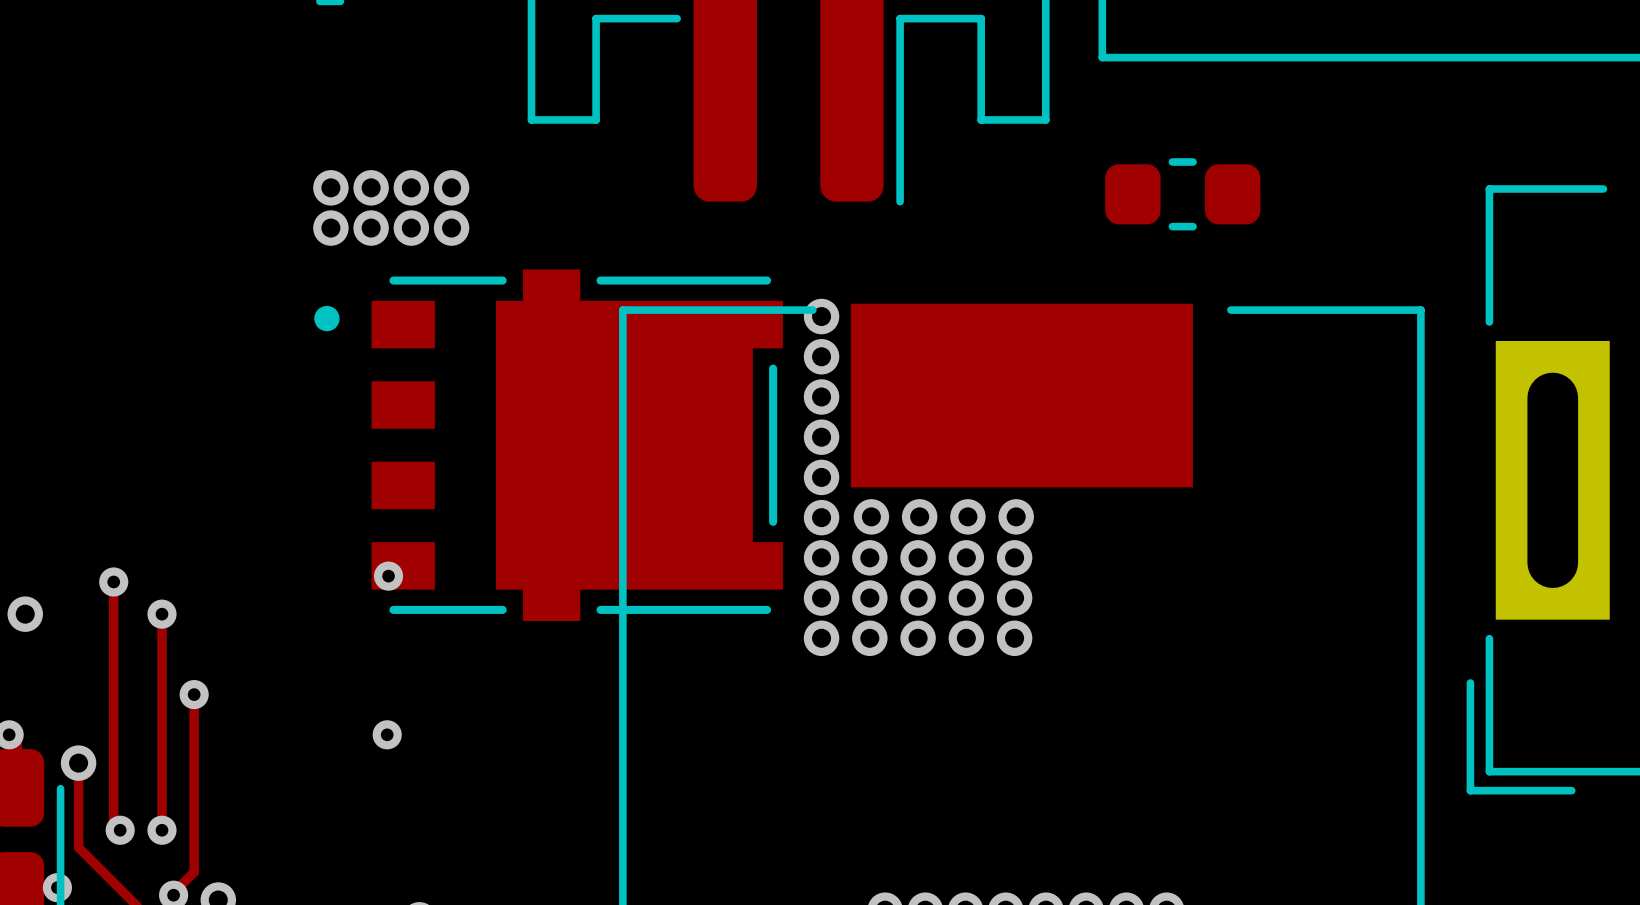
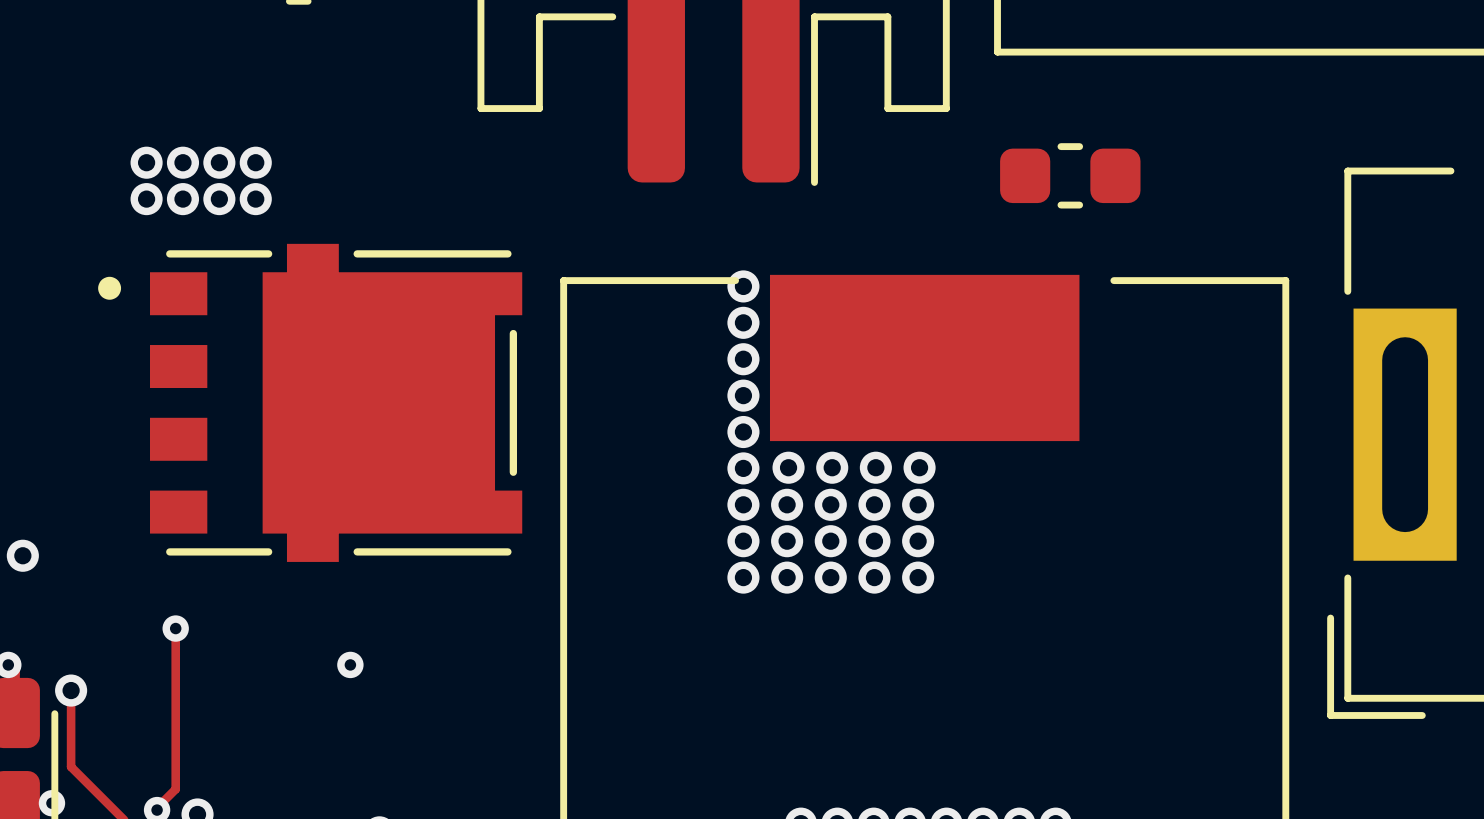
via: none -> (146, 162)
via: none -> (182, 162)
via: none -> (219, 162)
via: none -> (255, 162)
via: (330, 187) -> none
via: (371, 187) -> none
via: (411, 187) -> none
via: (451, 187) -> none
via: none -> (146, 199)
via: none -> (182, 199)
via: none -> (219, 199)
via: none -> (255, 199)
via: (330, 228) -> none
via: (371, 228) -> none
via: (411, 228) -> none
via: (451, 228) -> none
part position: (548, 445) -> (310, 402)
via: (388, 576) -> none
track: (113, 581) (113, 823) (120, 830) -> none
via: (113, 581) -> none
track: (161, 614) (161, 830) -> none
via: (161, 614) -> none
via: (120, 830) -> none
via: (161, 830) -> none

